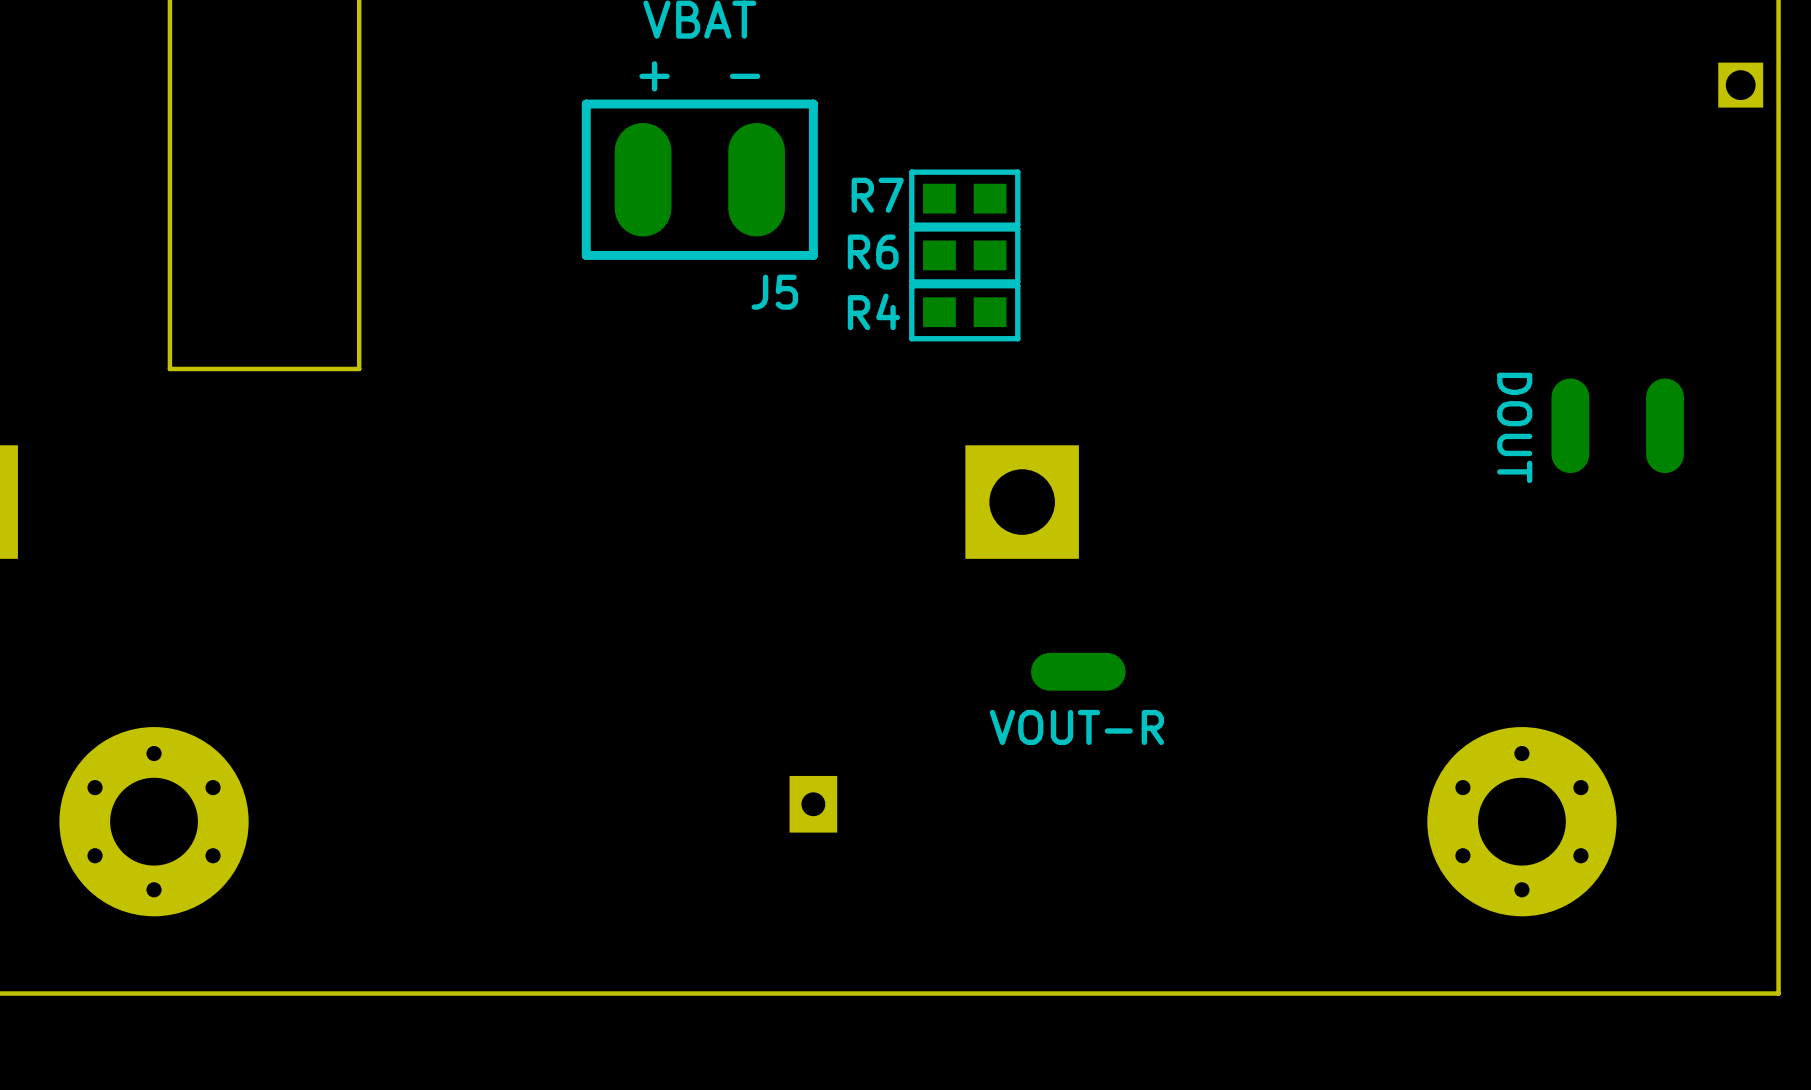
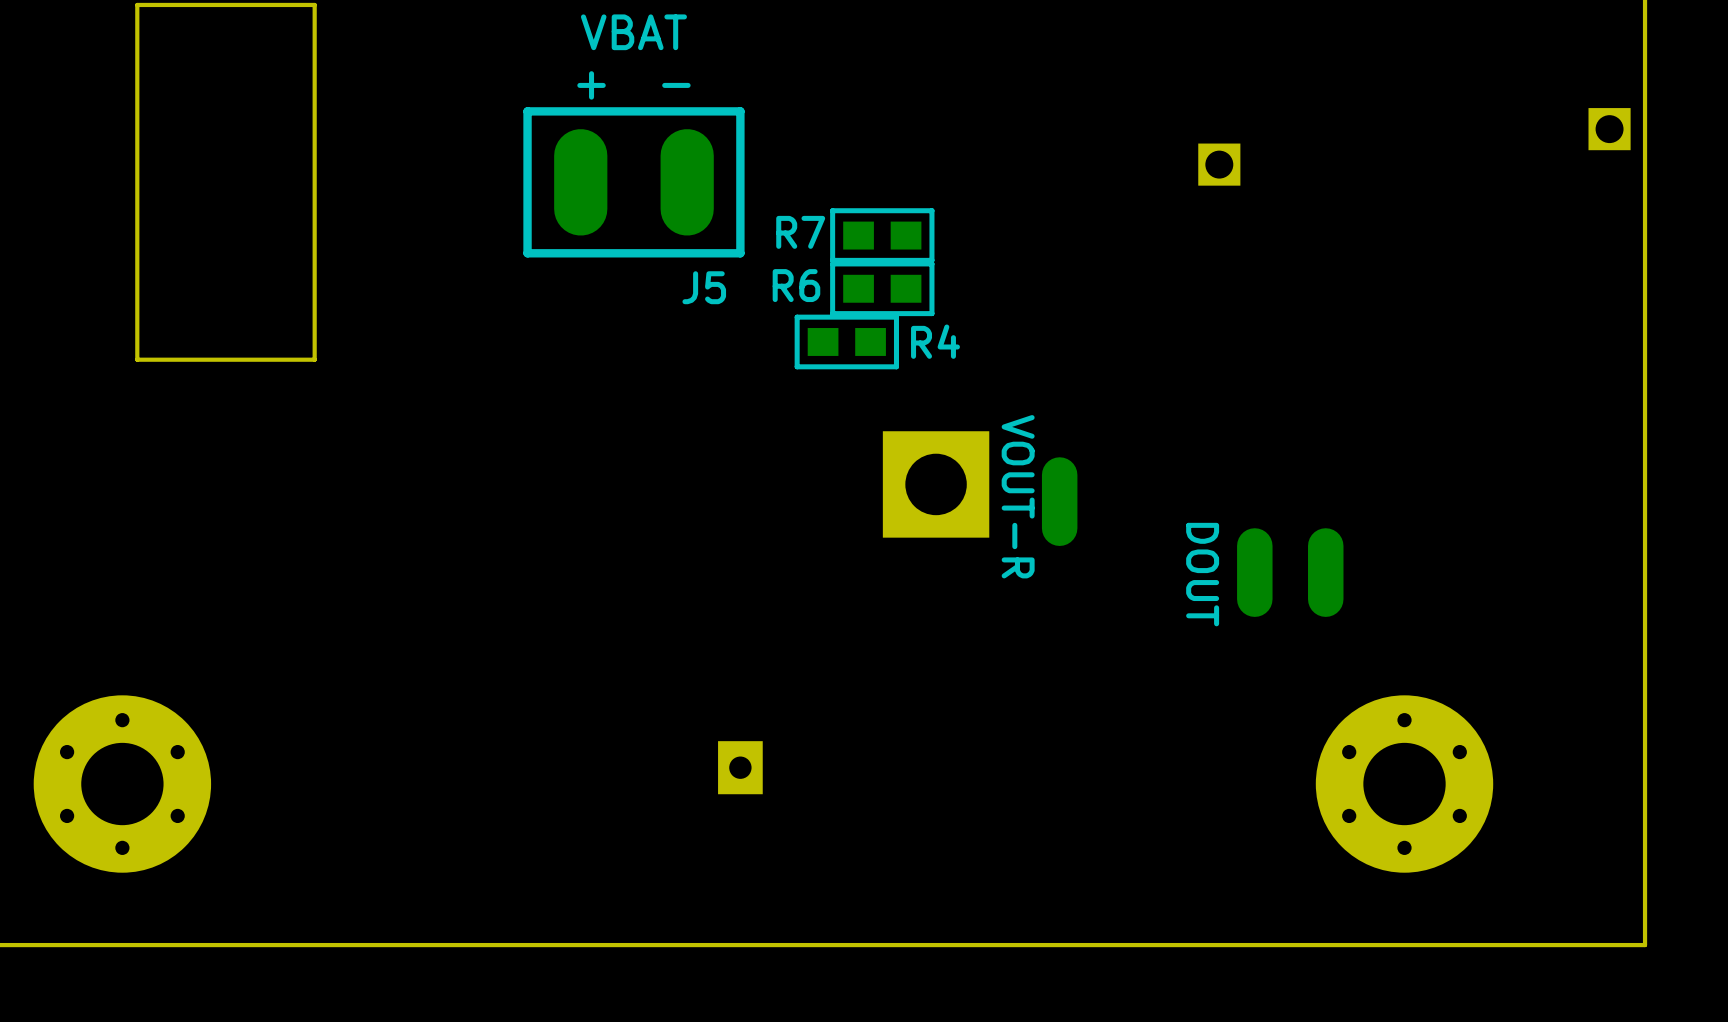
part position: (1740, 85) -> (1609, 129)
part: none -> (1219, 164)
R7 position: (964, 198) -> (882, 235)
R6 position: (964, 255) -> (882, 288)
R4 name position: R4 (873, 311) -> R4 (935, 341)
R4 position: (964, 312) -> (846, 341)
part position: (1570, 425) -> (1254, 572)
part position: (1665, 425) -> (1325, 572)
part rotation: 0° (1078, 671) -> 90° clockwise (1059, 501)
part position: (1078, 671) -> (1059, 501)

